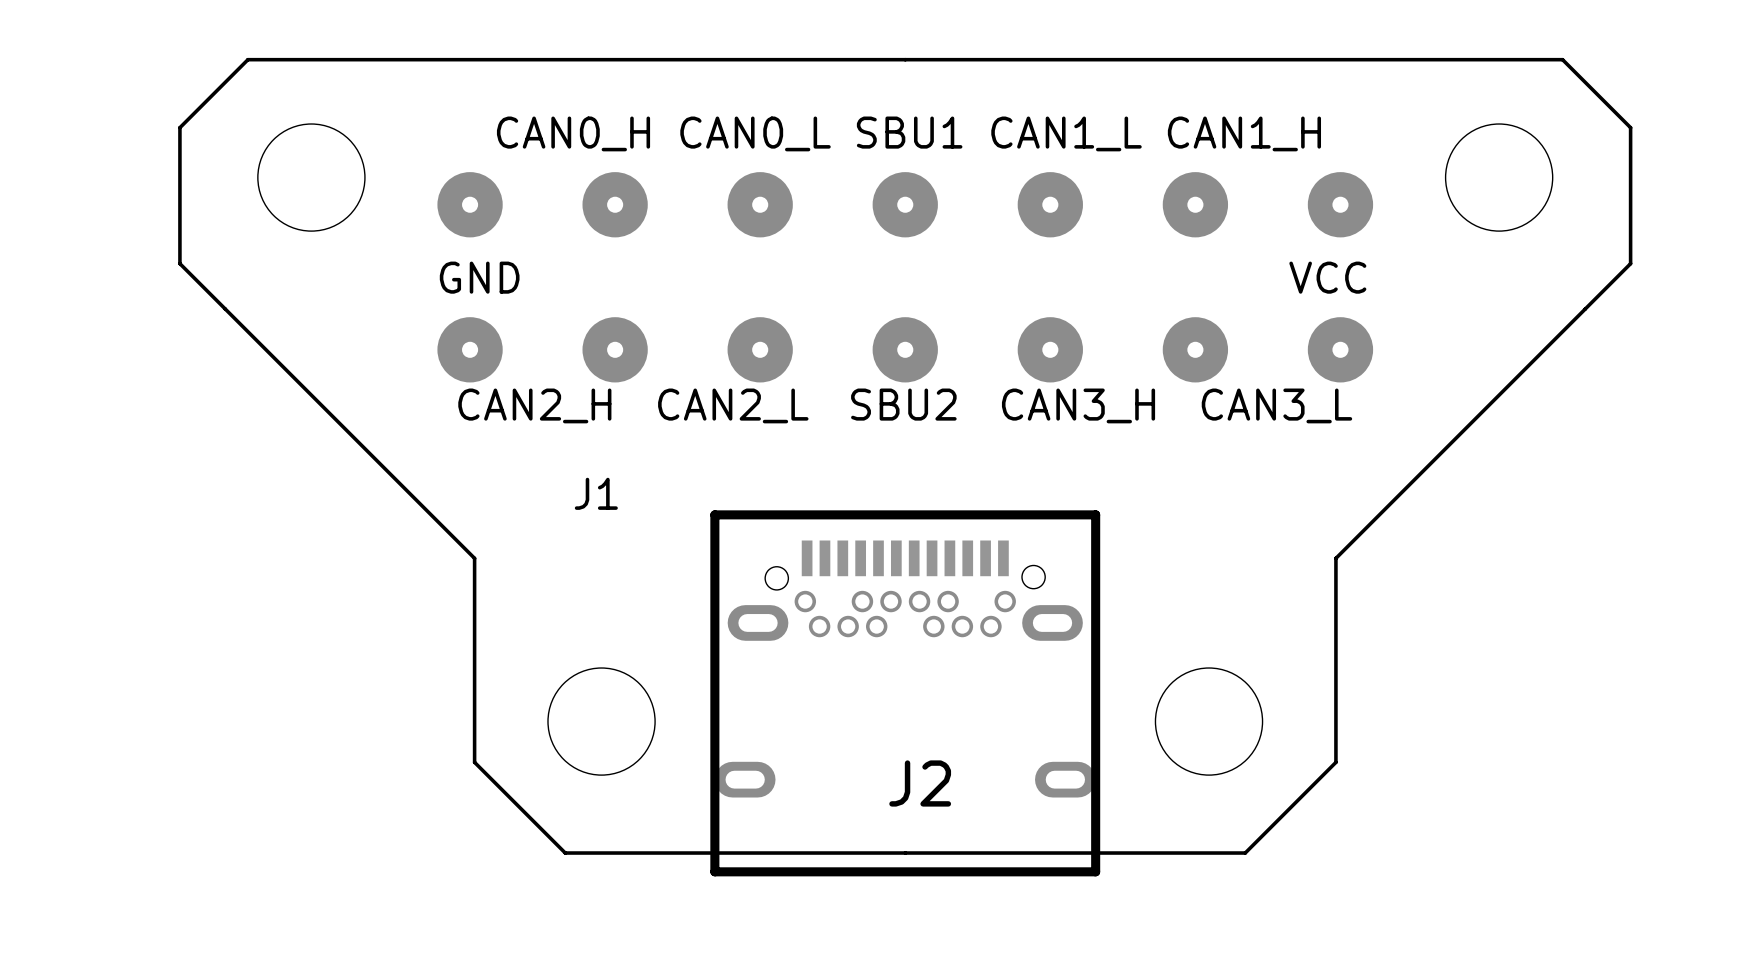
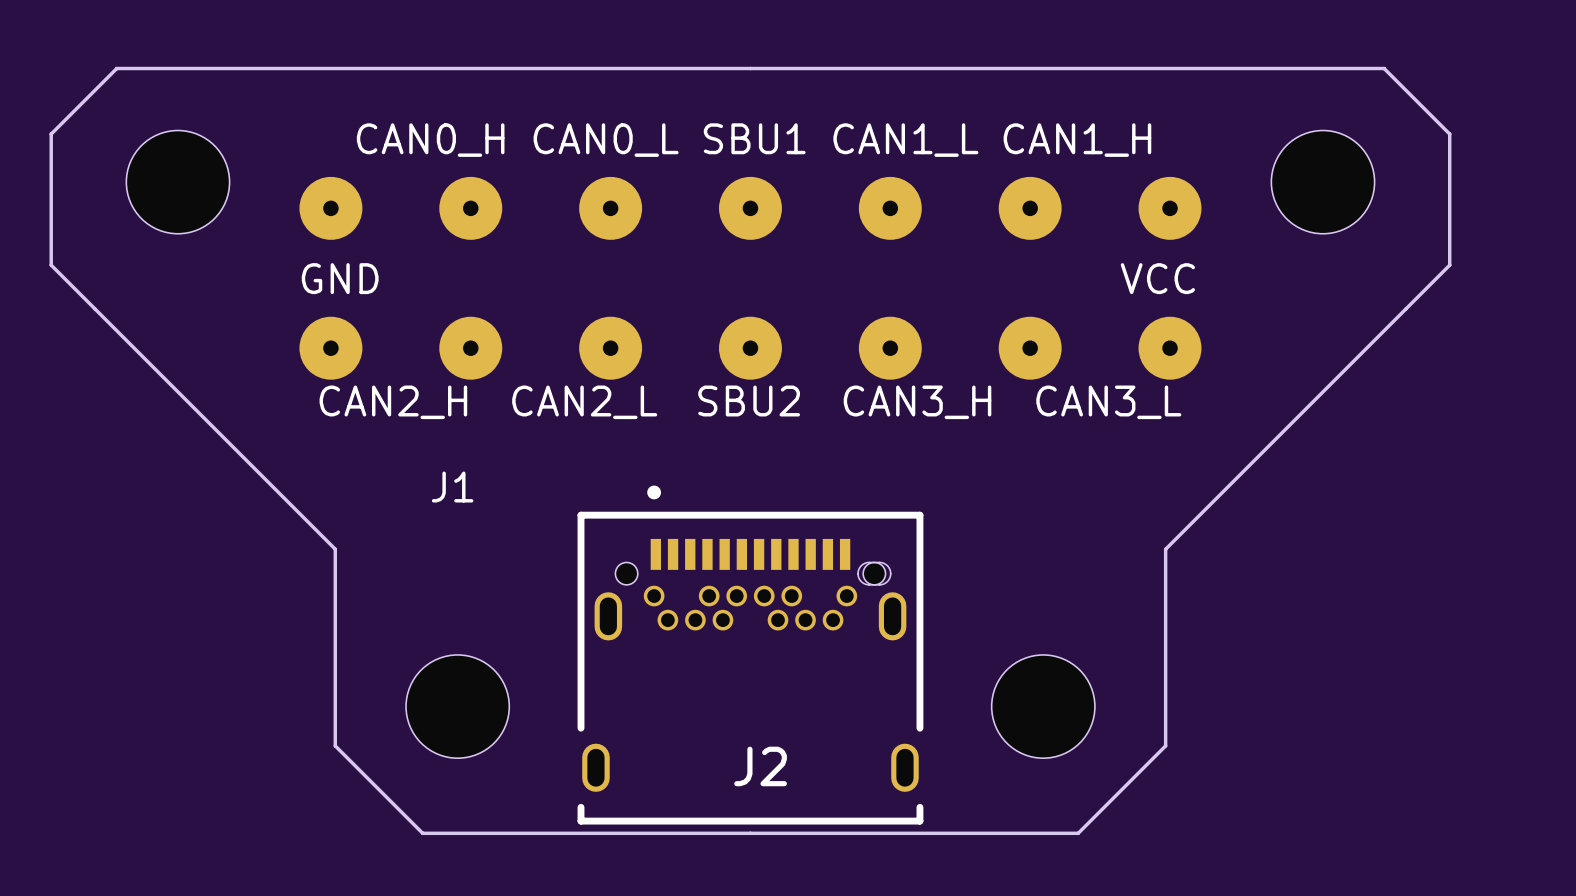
J2 footprint: [710, 510, 1101, 877] -> [577, 485, 924, 825]

